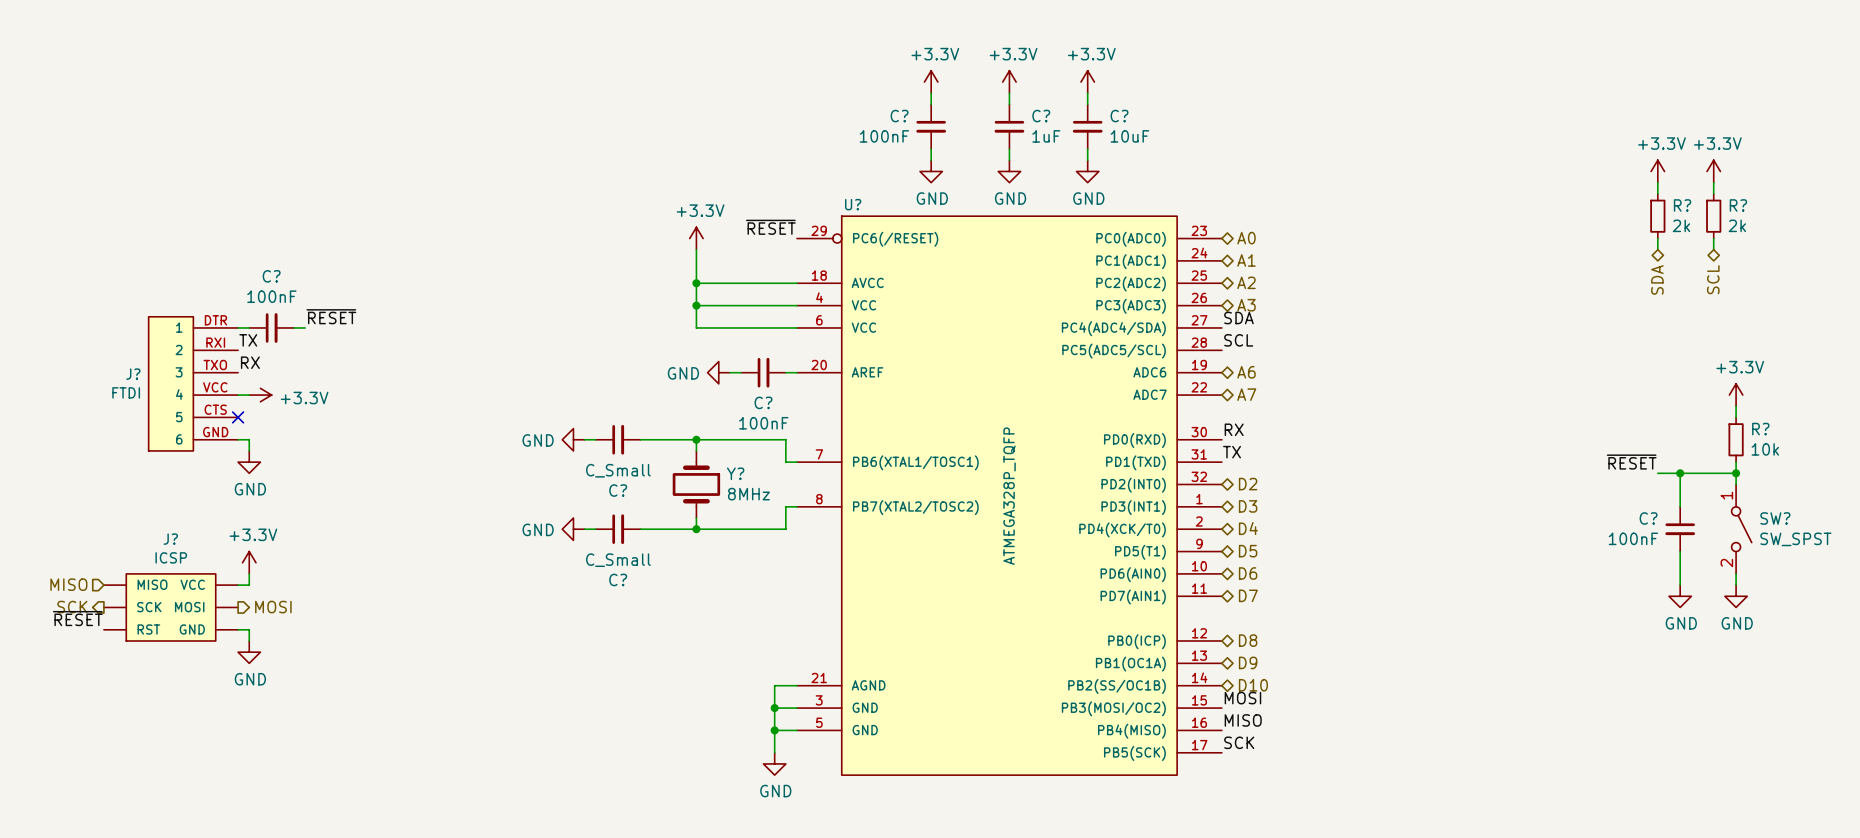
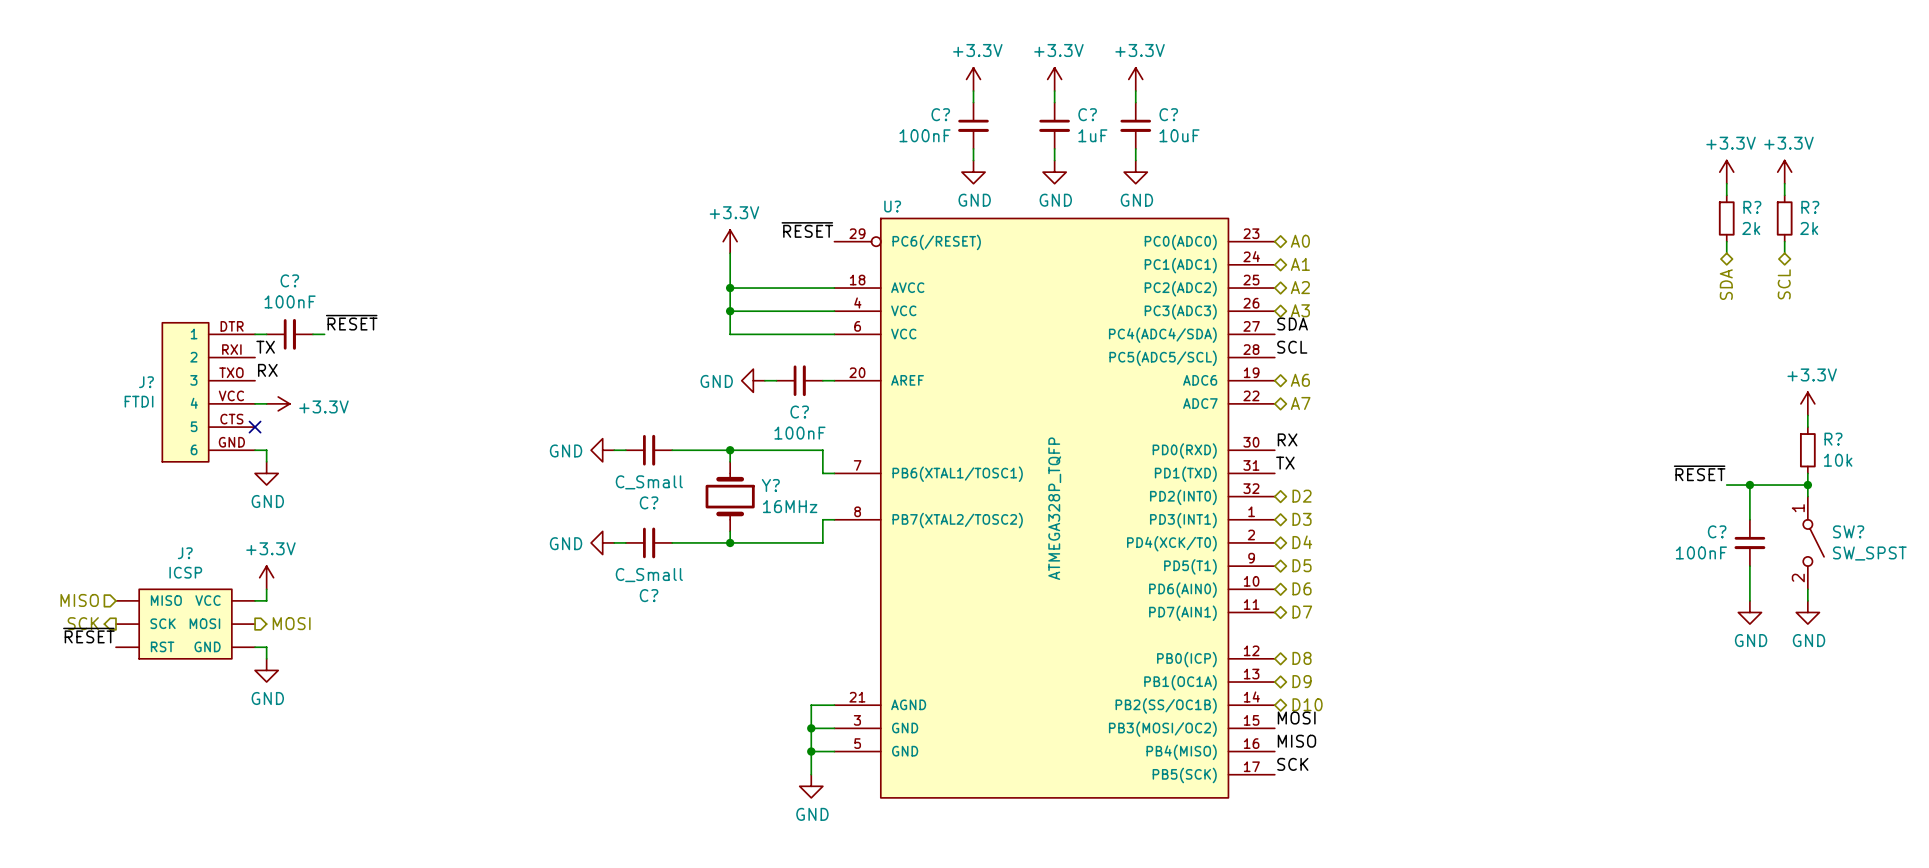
Y? value: 8MHz (748, 494) -> 16MHz (790, 506)

